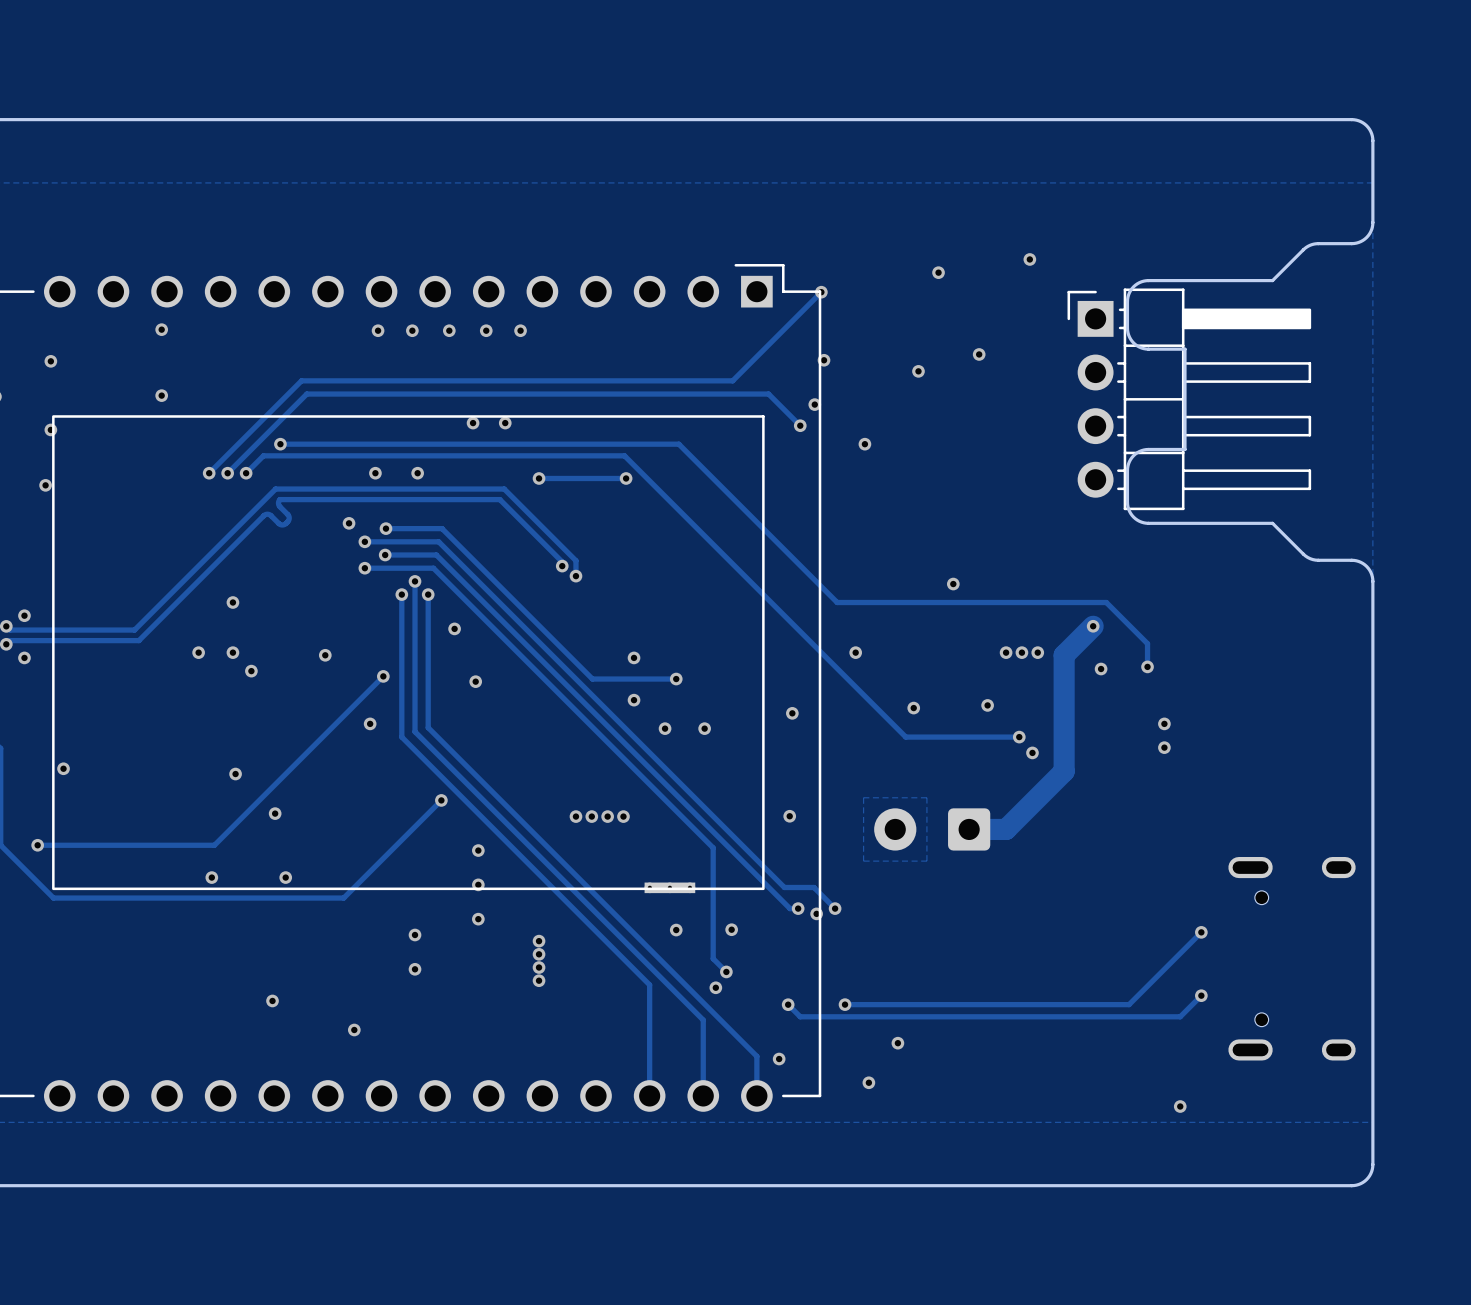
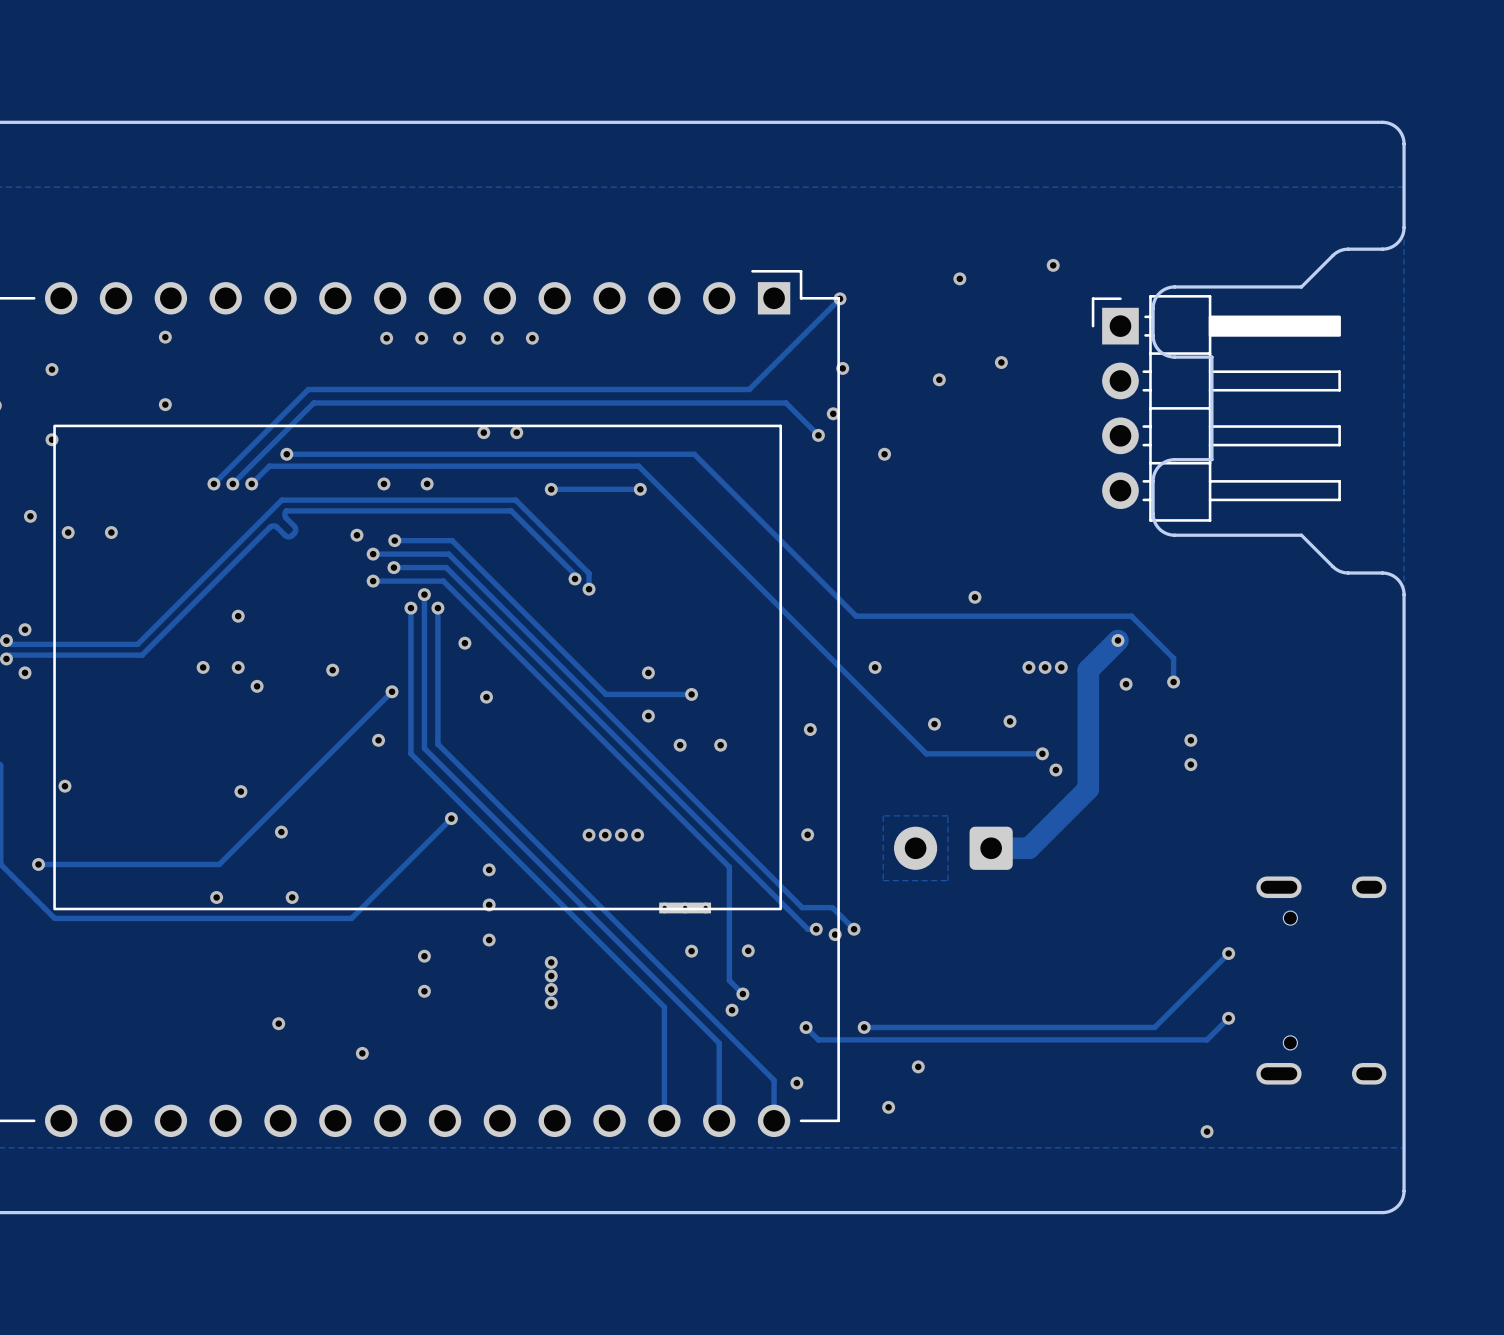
via: (45, 485) -> none
via: none -> (30, 516)
via: none -> (68, 532)
via: none -> (111, 532)

